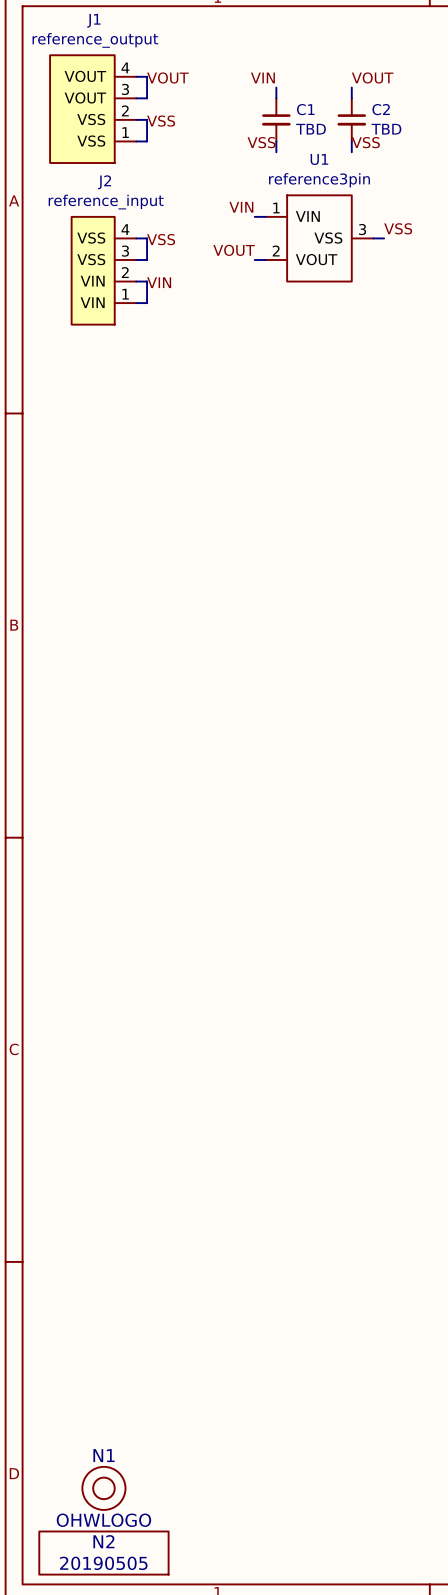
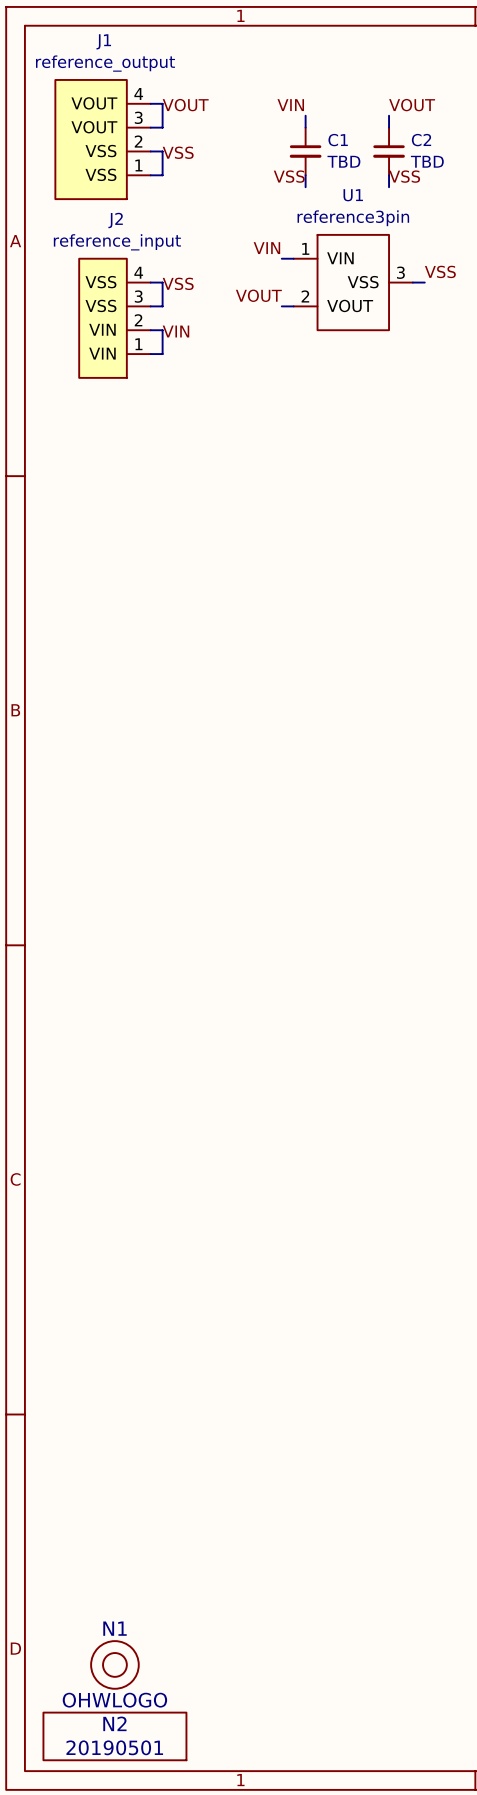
N2 value: 20190505 (103, 1563) -> 20190501 (114, 1747)

